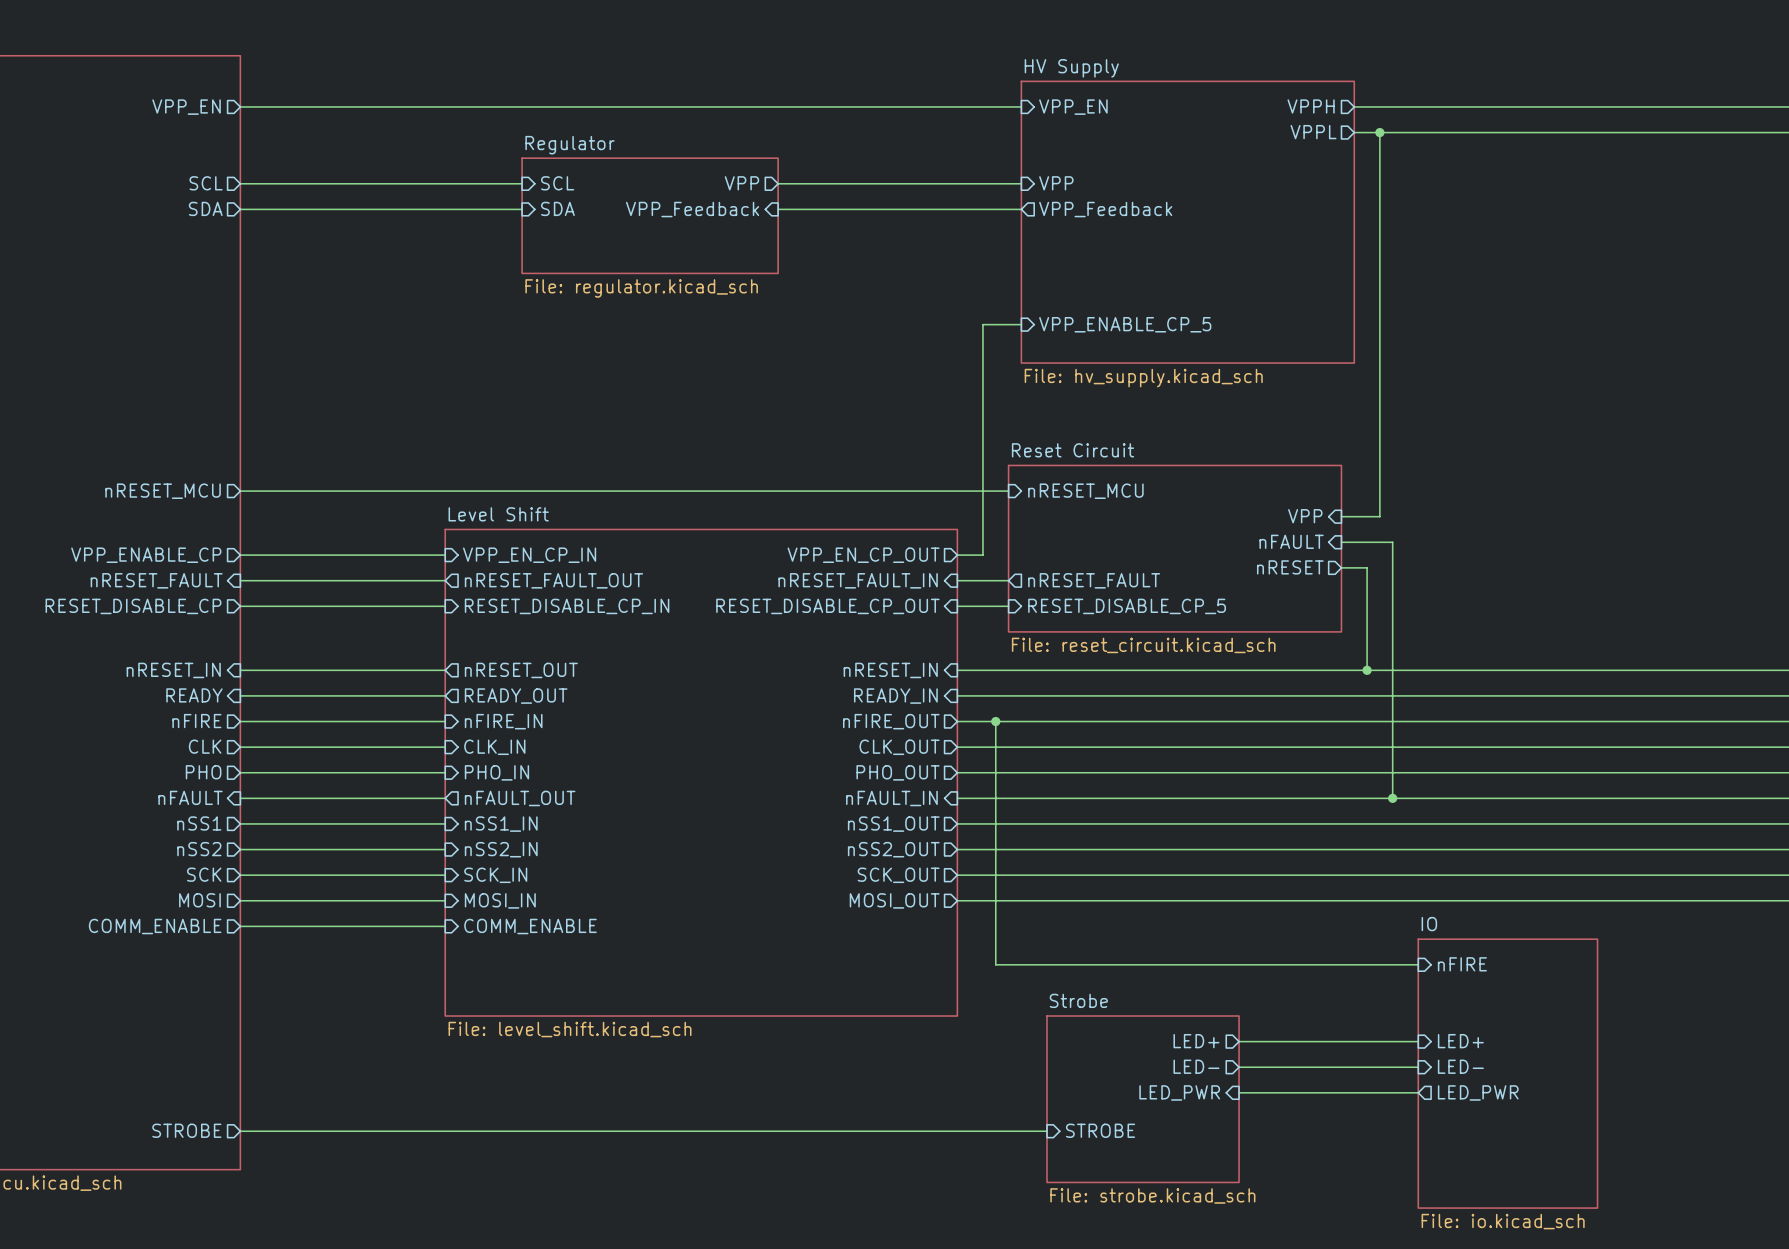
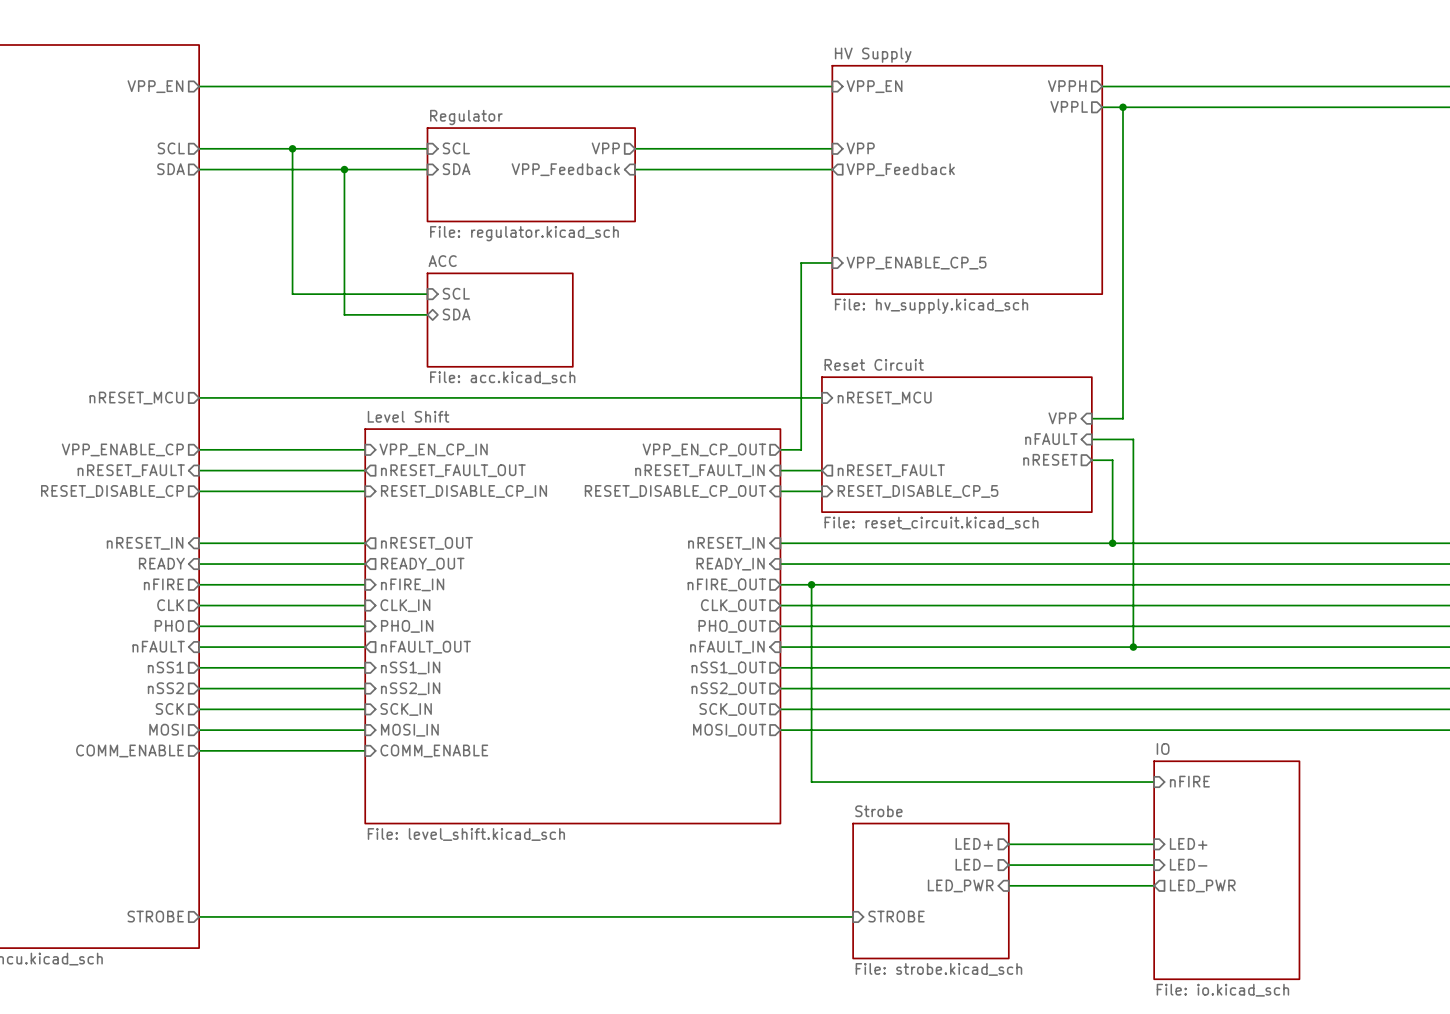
wire: none -> (292, 148) (292, 294) (427, 294)
junction: none -> (292, 148)
wire: none -> (344, 169) (344, 314) (427, 314)
junction: none -> (344, 169)
sheet pin: none -> SCL (456, 293)
sheet pin: none -> SDA (456, 314)
sheet ACC: none -> File: acc.kicad_sch (500, 320)

